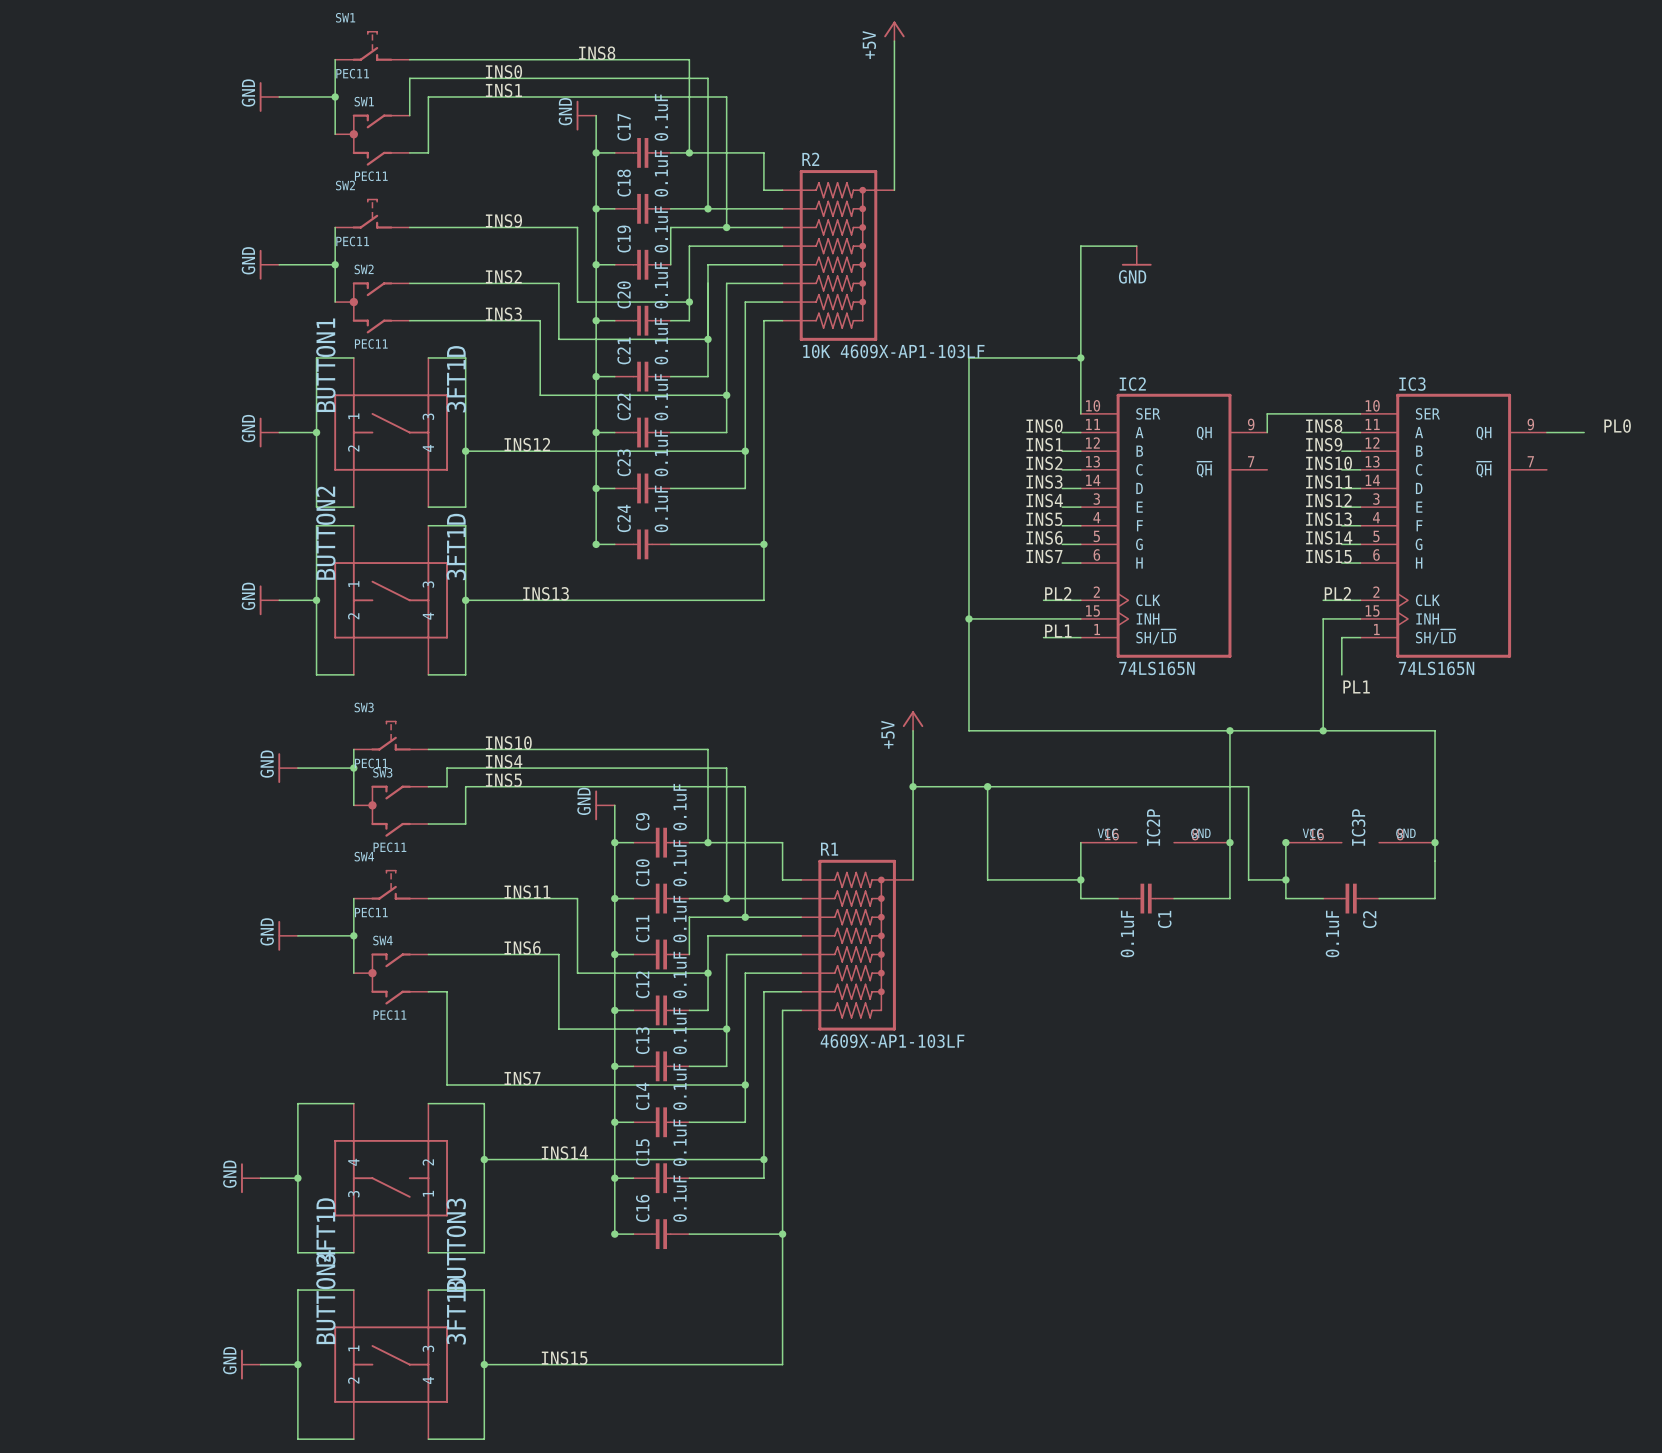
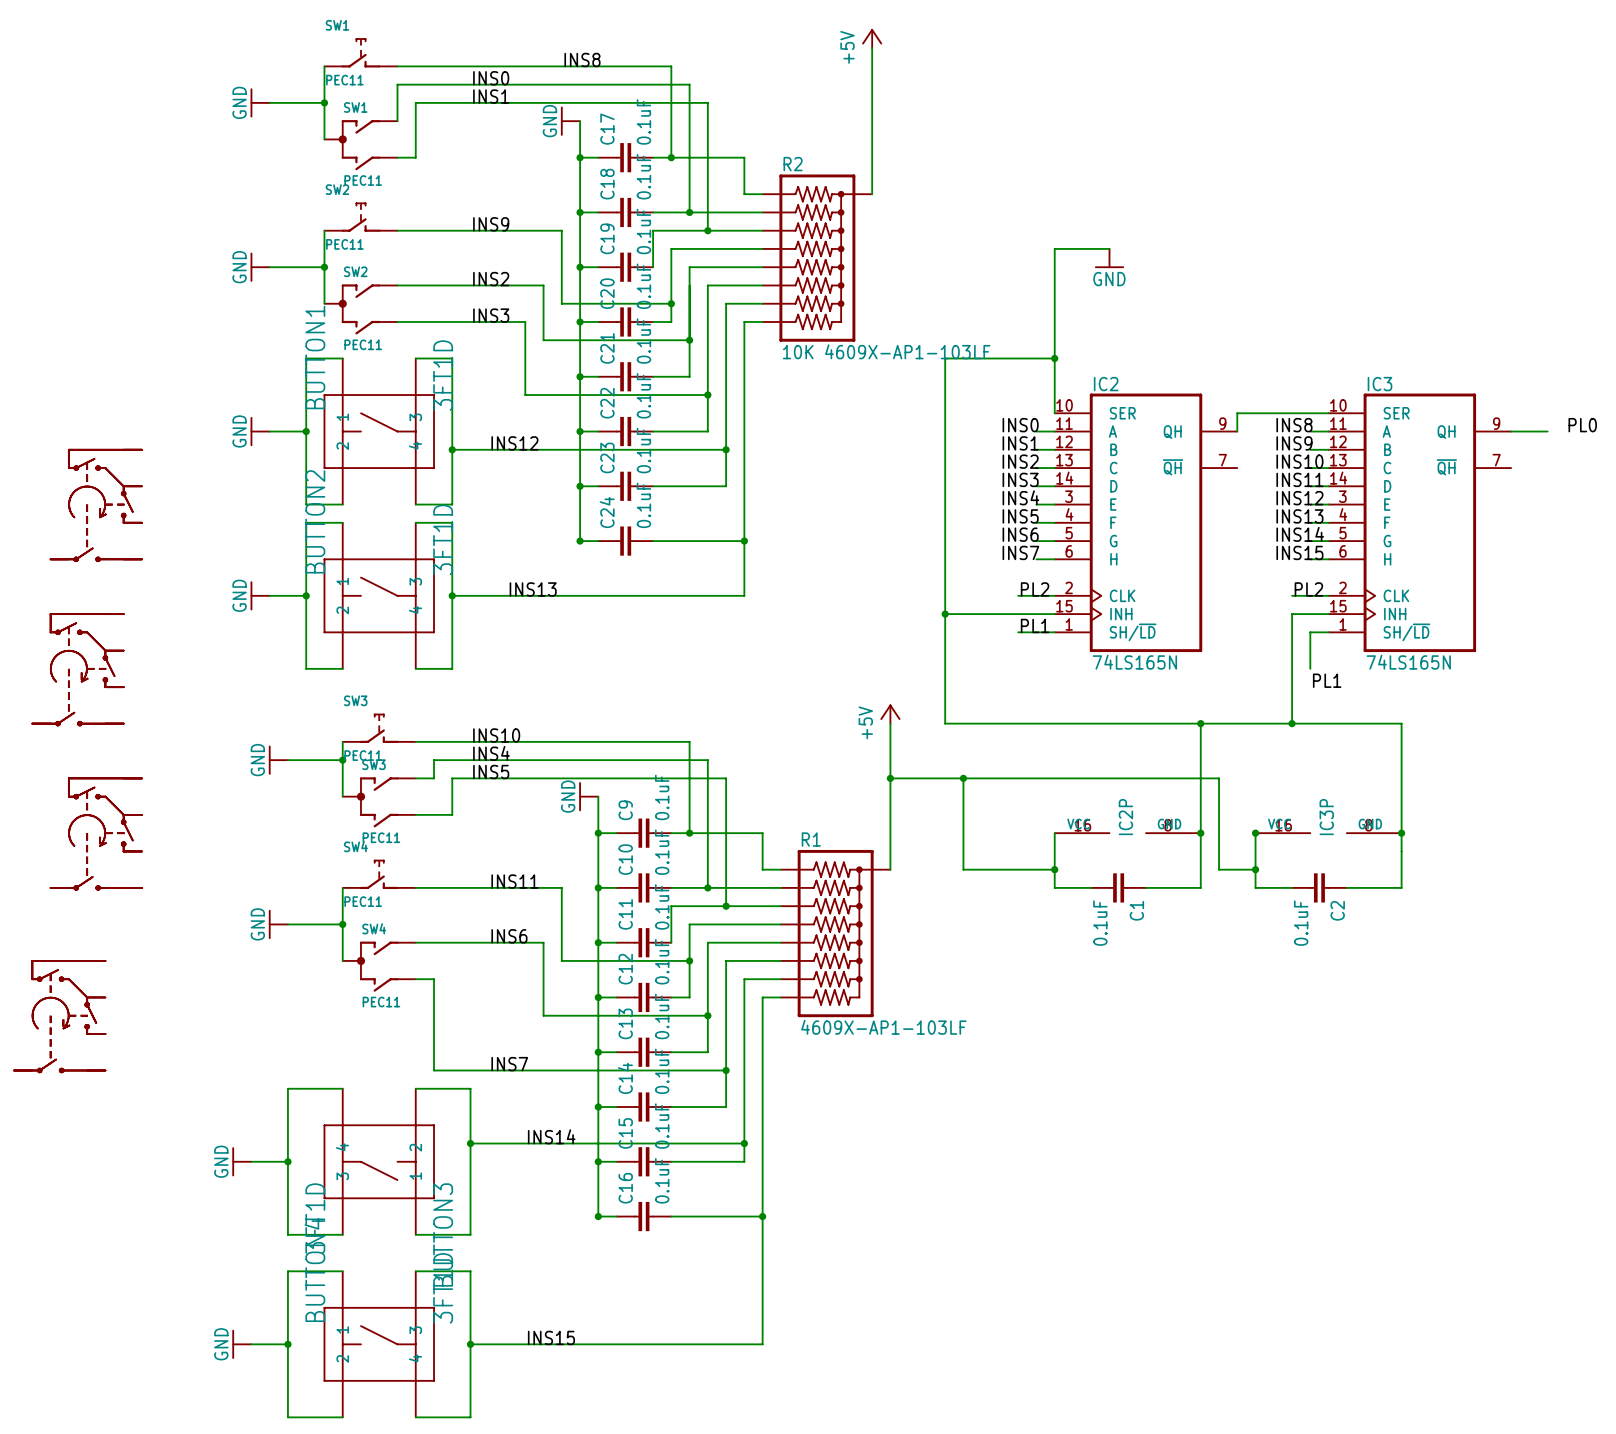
part: none -> (96, 505)
part: none -> (78, 669)
part: none -> (96, 834)
part: none -> (59, 1016)

